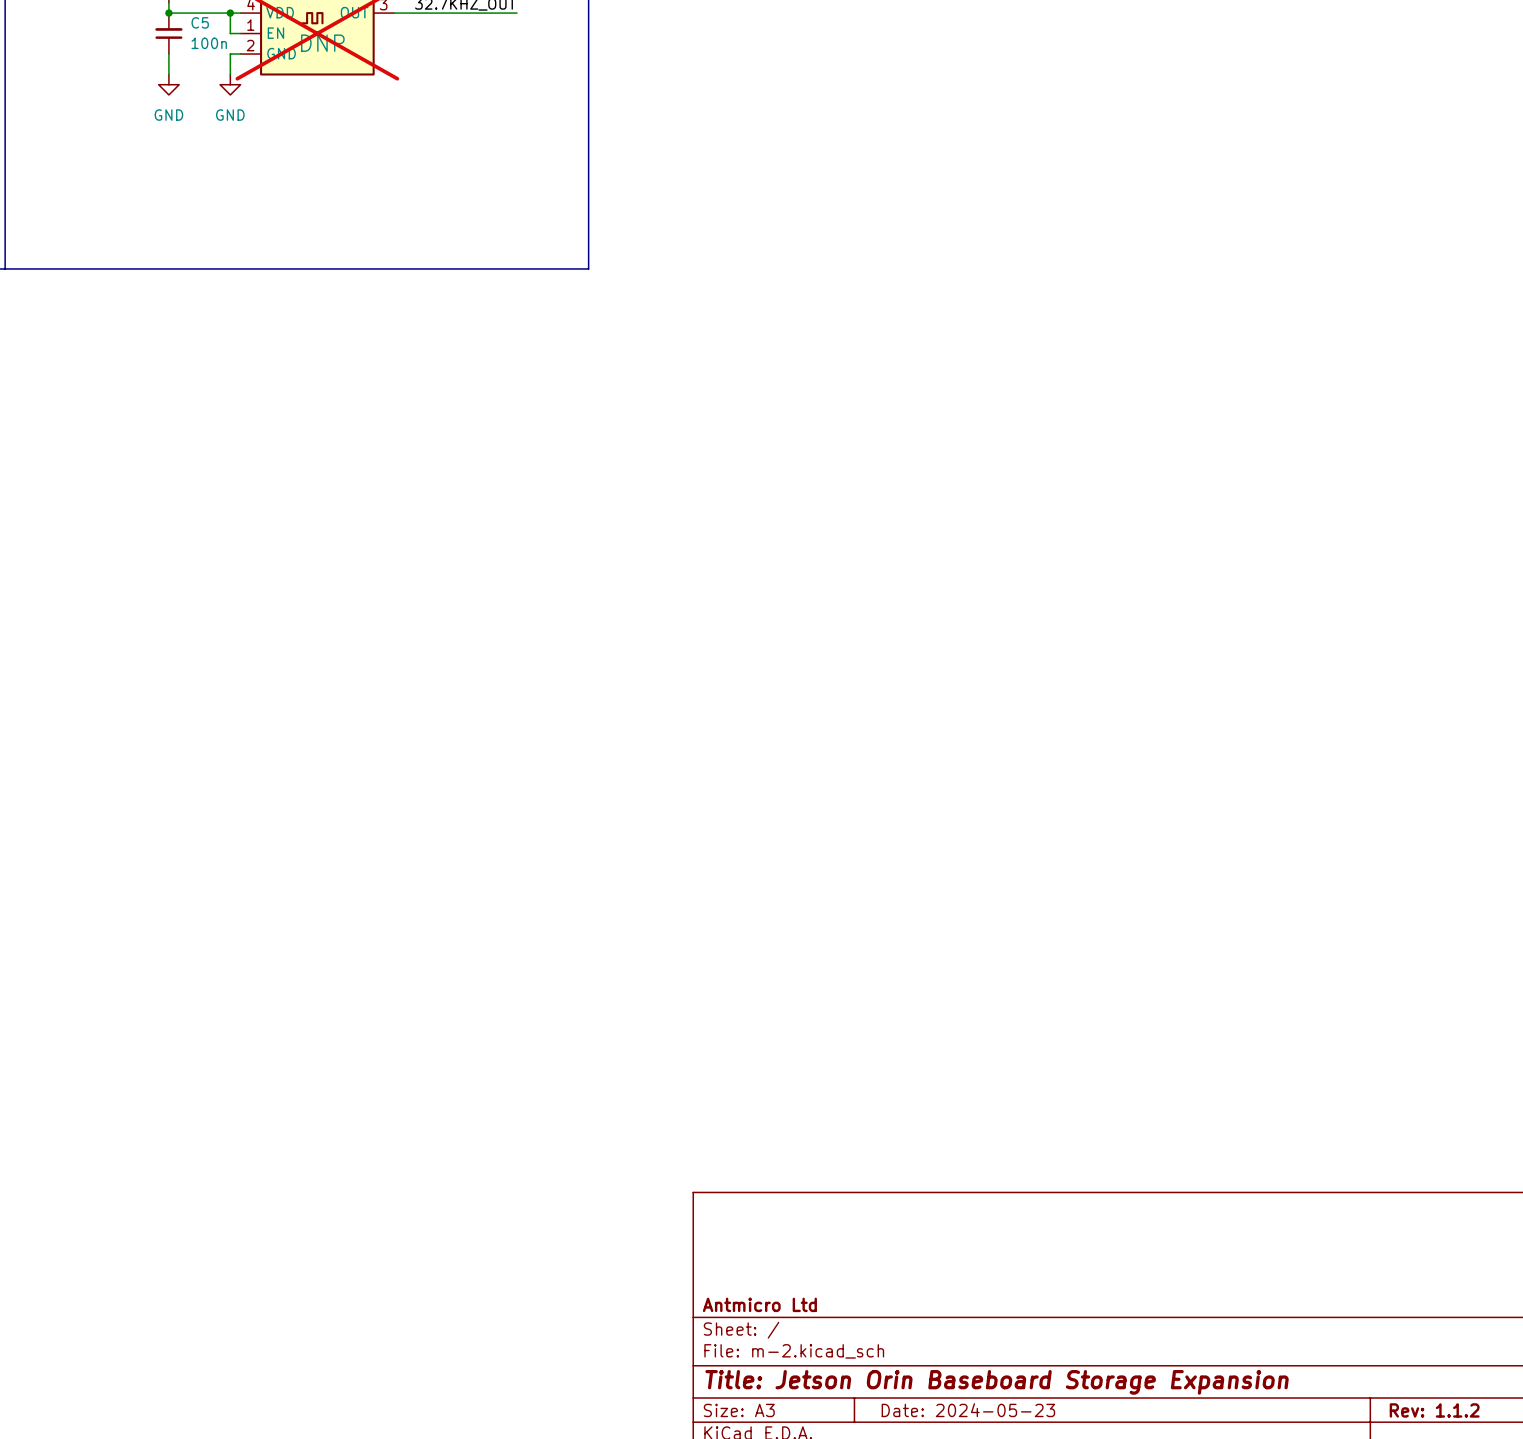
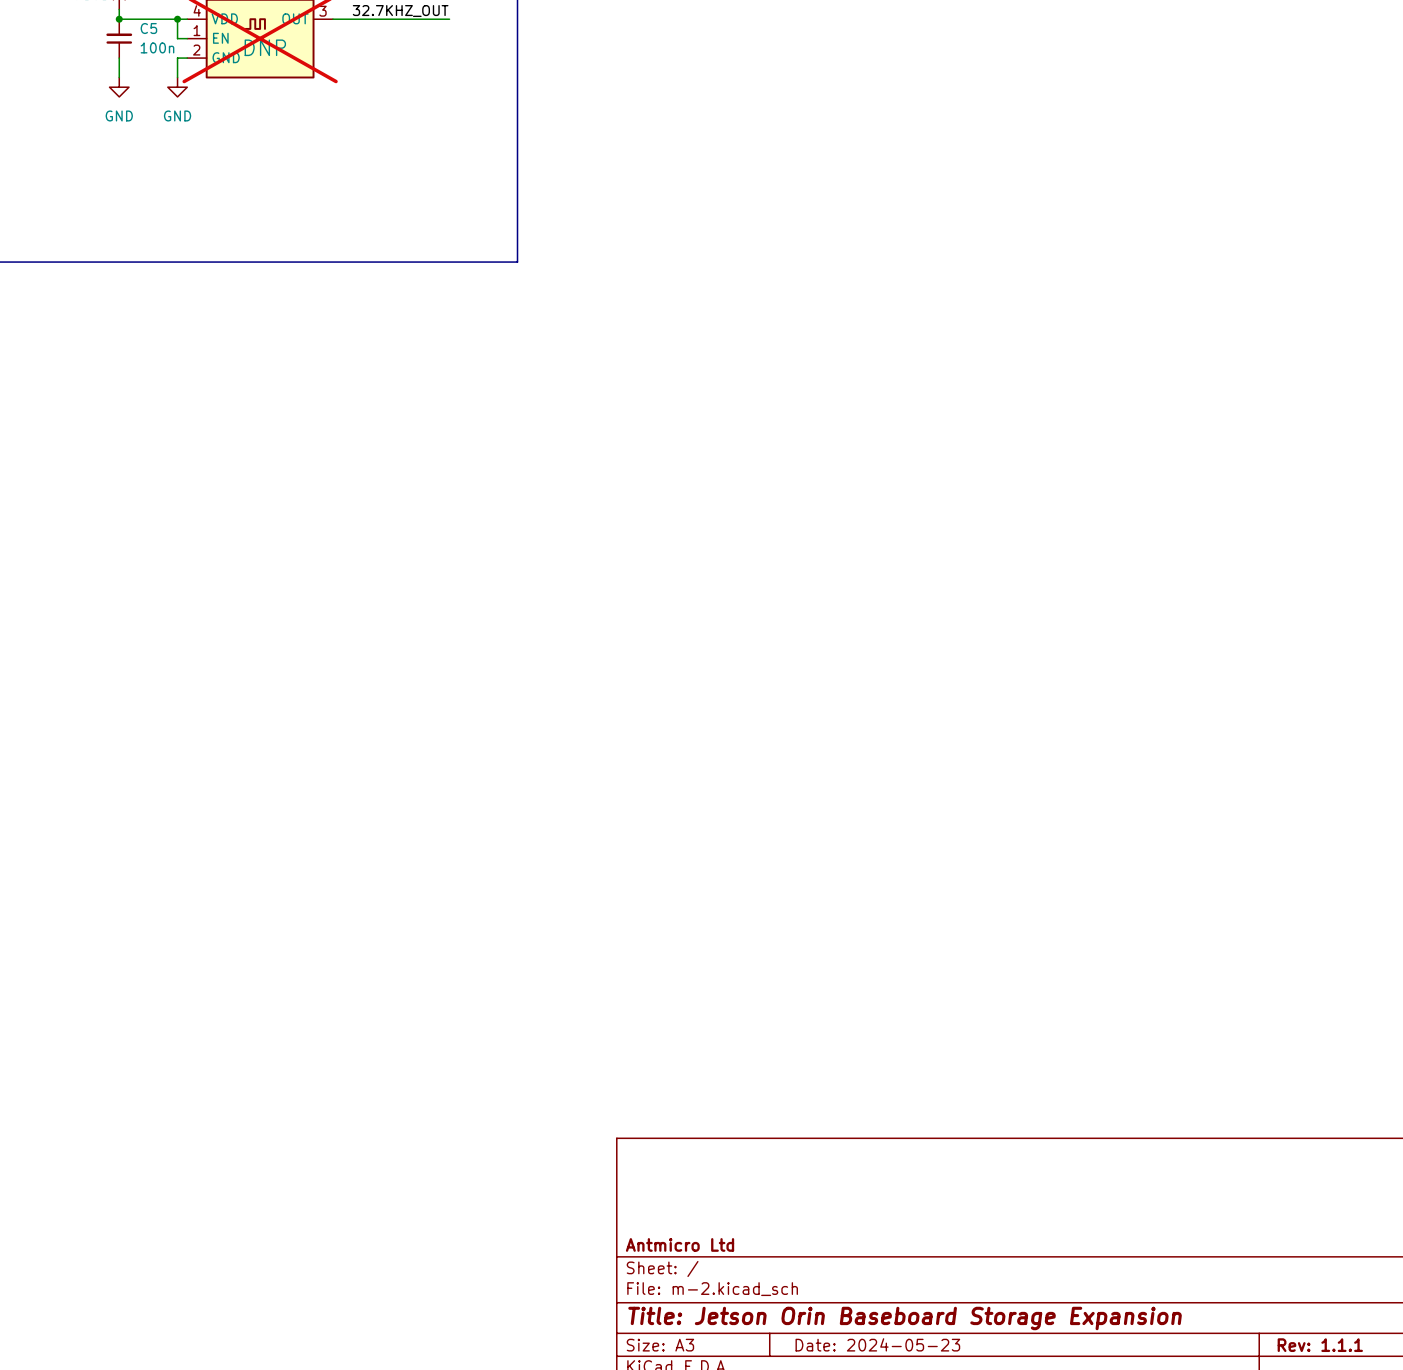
title block: Rev: 1.1.2 (1434, 1410) -> Rev: 1.1.1 (1320, 1345)

